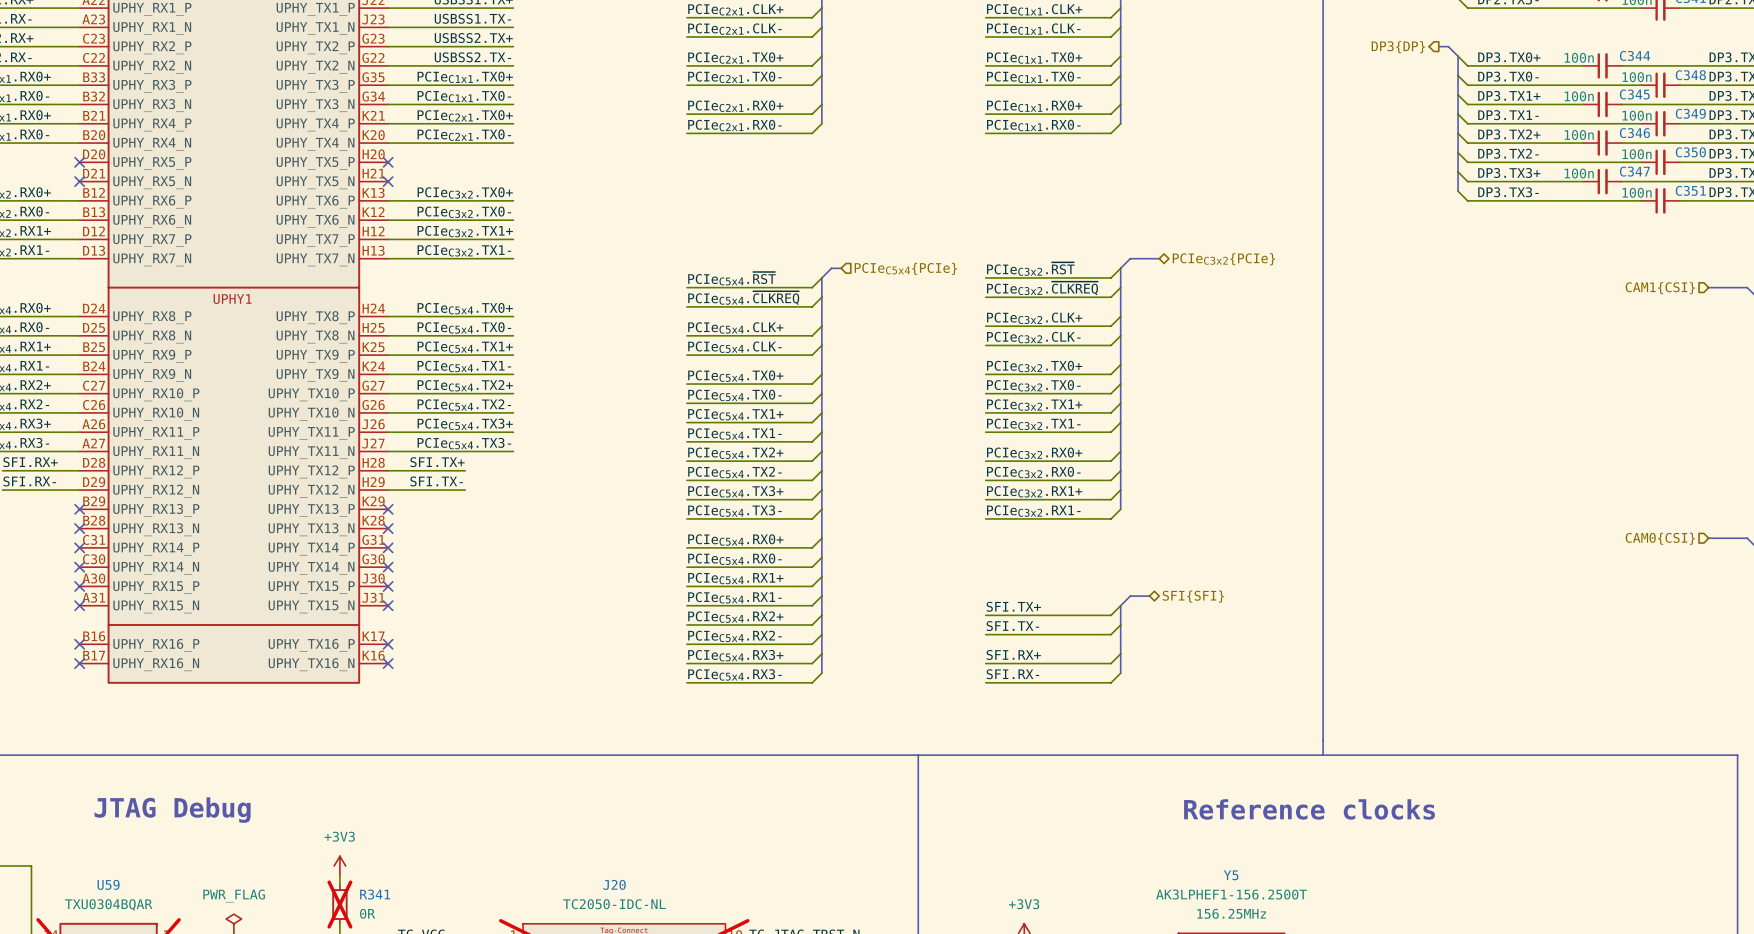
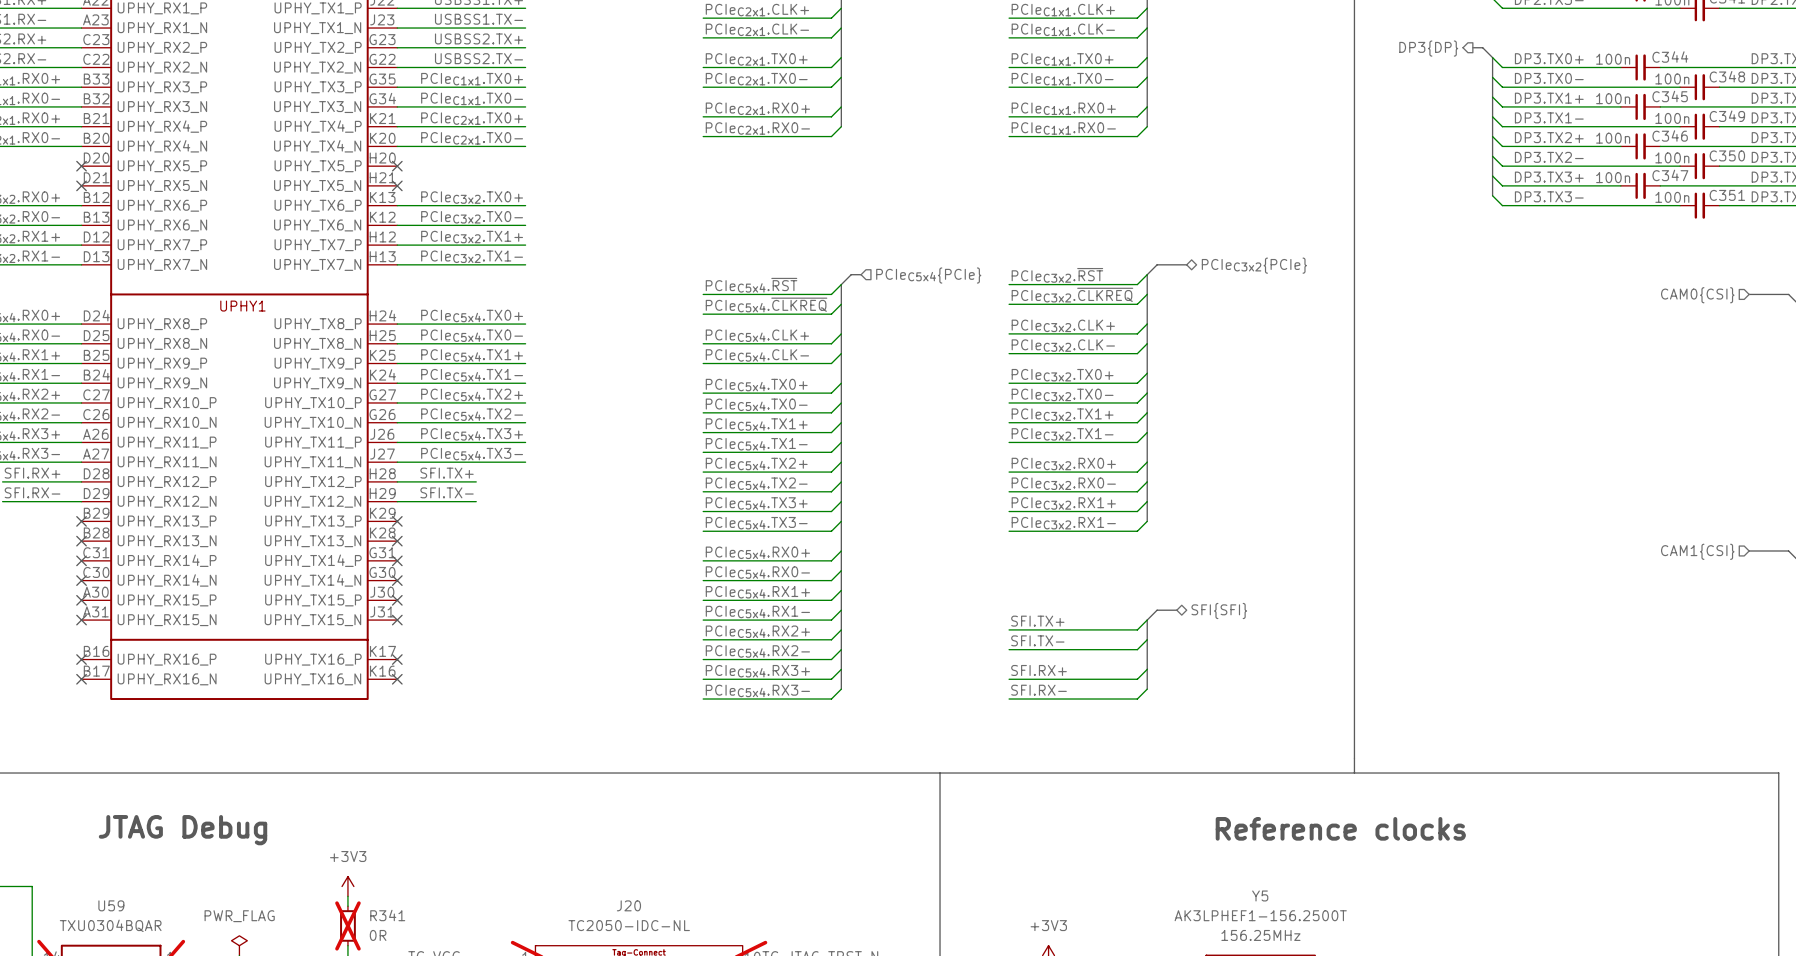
hierarchical label: CAM1{CSI} (1660, 288) -> CAM0{CSI} (1697, 295)
hierarchical label: CAM0{CSI} (1660, 538) -> CAM1{CSI} (1697, 551)

